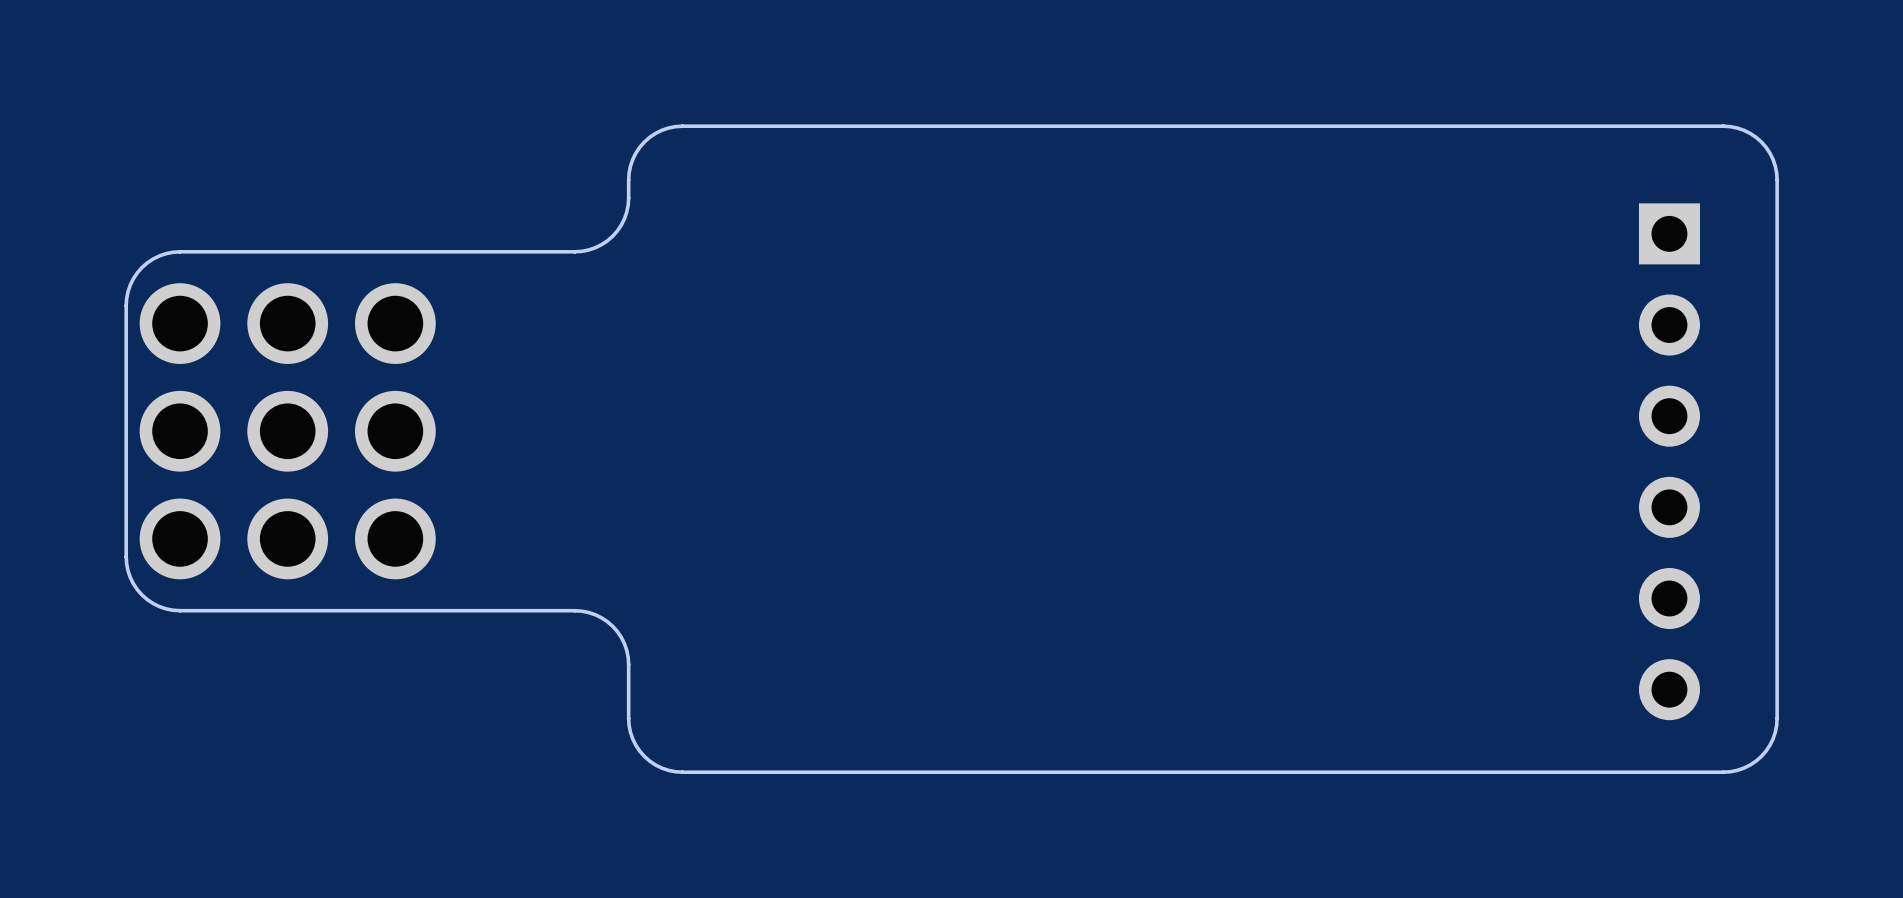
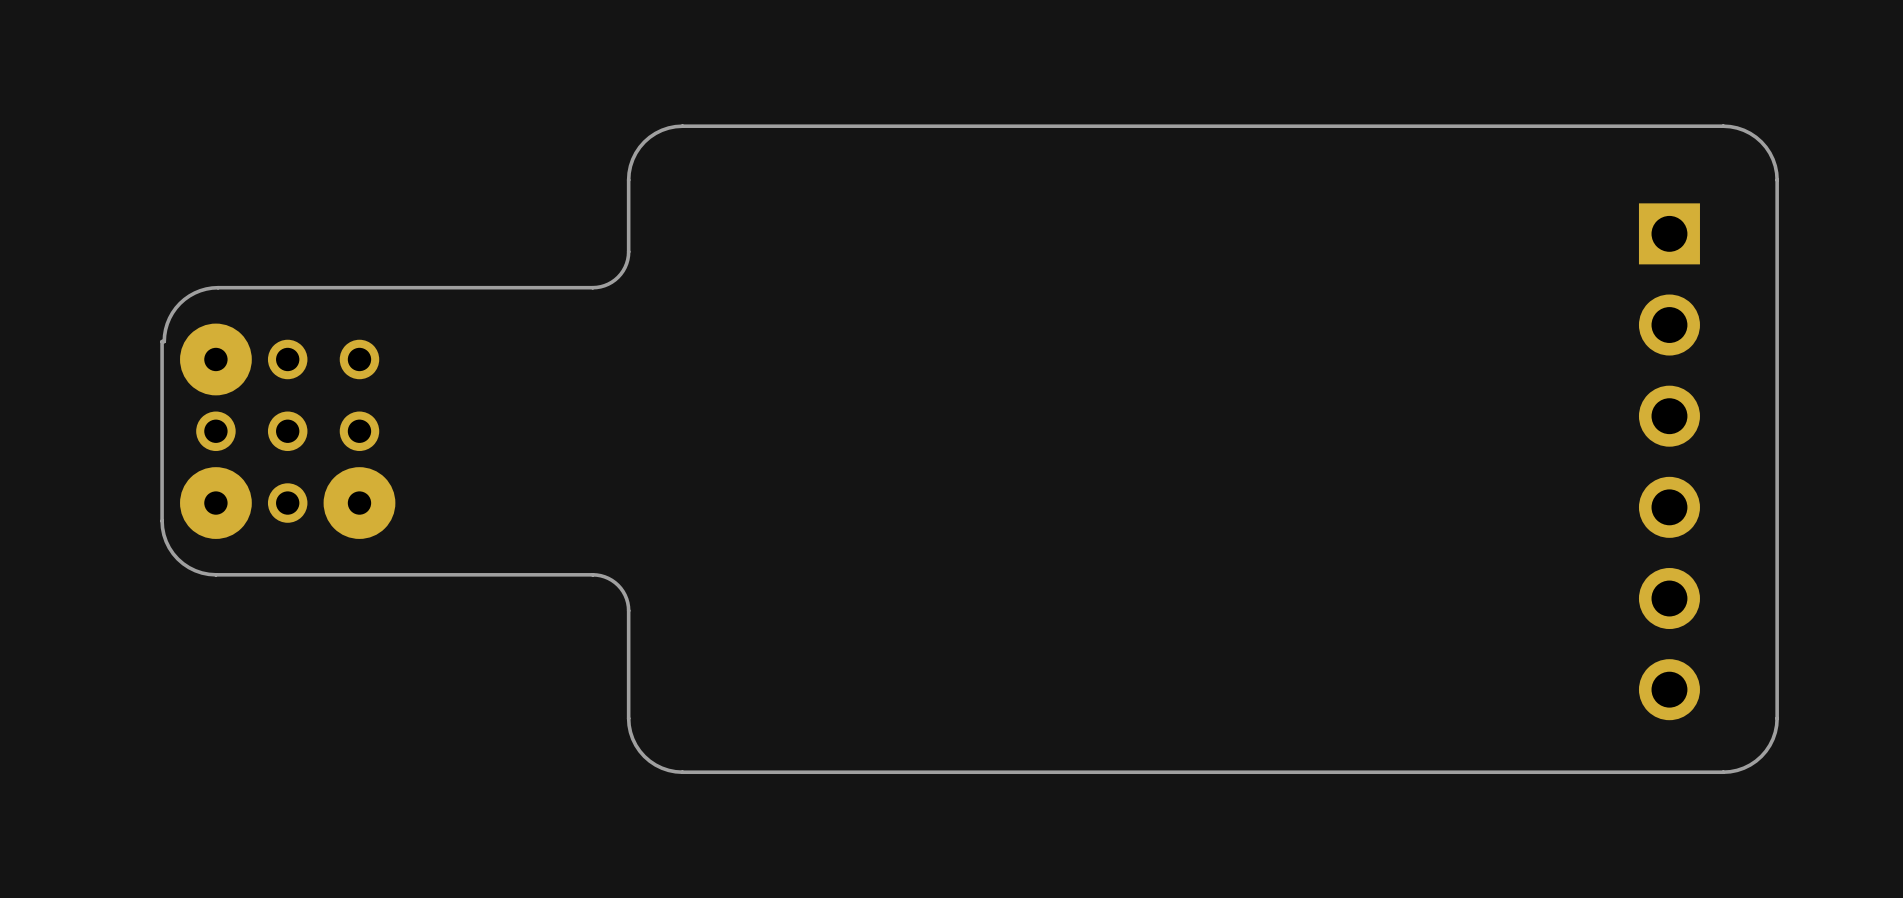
board edge: (628, 197) (626, 211) (617, 230) (607, 240) (588, 249) (574, 251) (173, 252) (159, 255) (141, 267) (130, 285) (126, 305) (126, 563) (133, 583) (147, 599) (159, 606) (180, 610) (581, 611) (595, 614) (612, 626) (624, 643) (628, 664) -> (628, 197) (627, 259) (620, 274) (604, 285) (592, 287) (212, 288) (194, 293) (180, 303) (169, 318) (164, 341) (162, 341) (162, 528) (169, 547) (183, 563) (201, 572) (215, 574) (600, 575) (615, 582) (626, 598) (628, 610) (628, 664)
part footprint: [139, 283, 436, 580] -> [180, 323, 396, 539]

